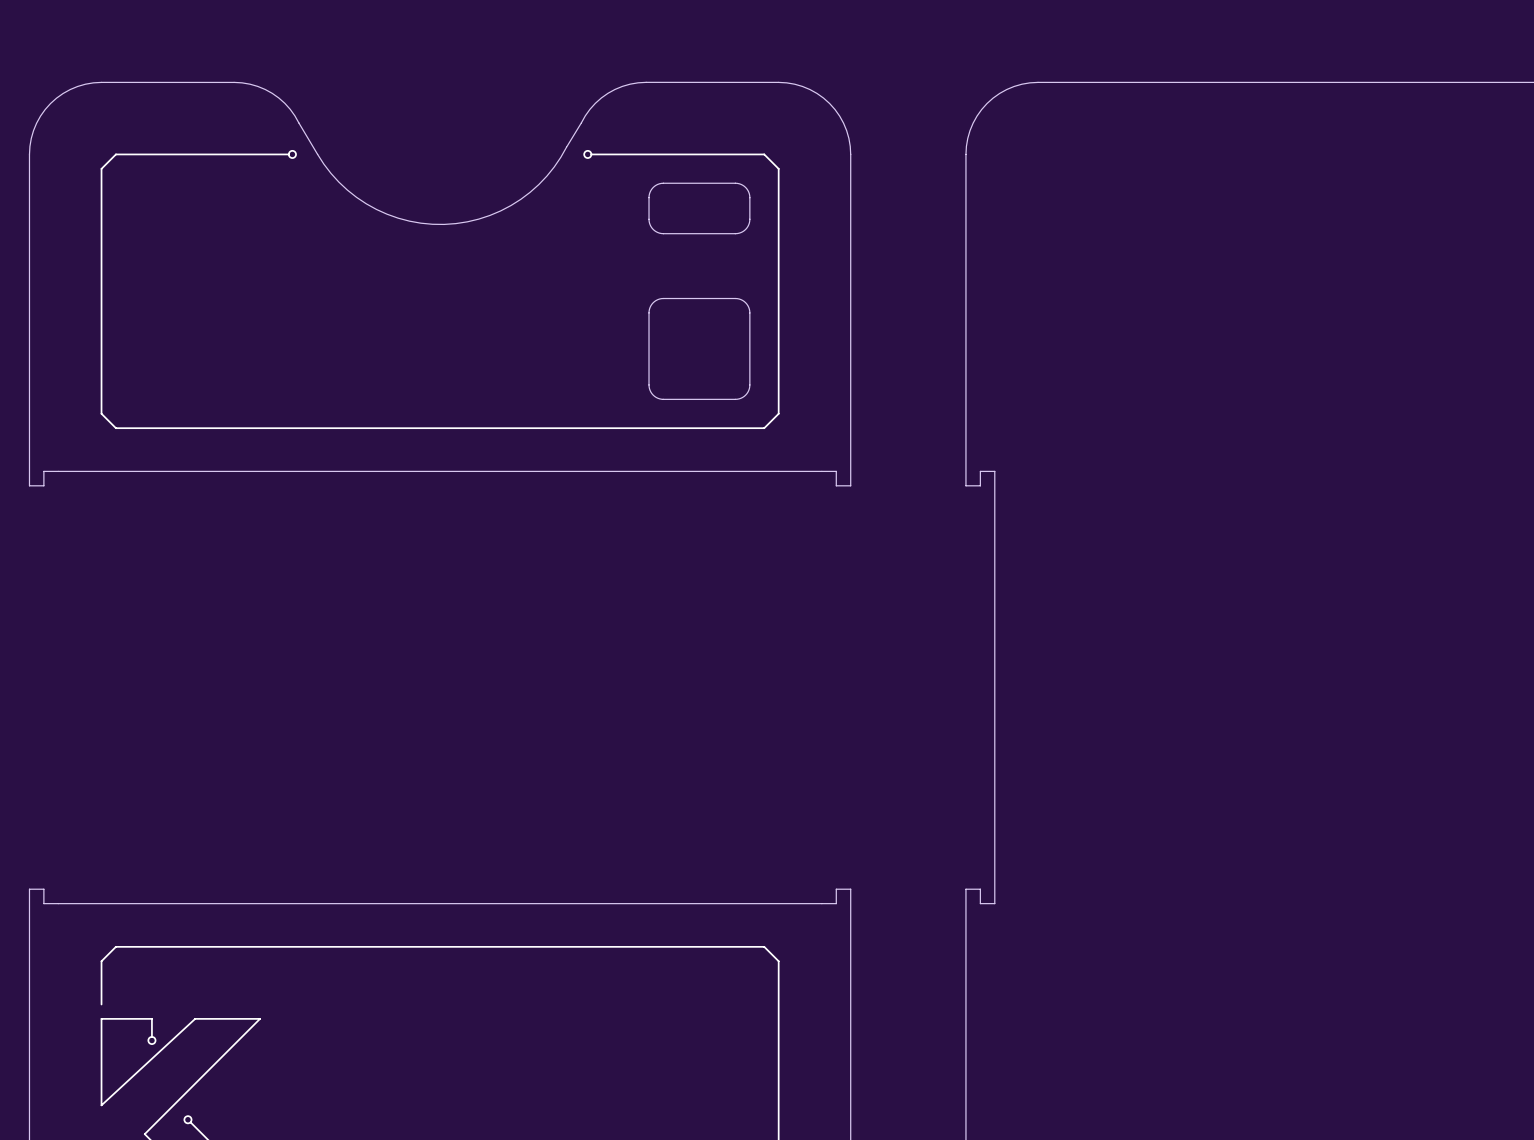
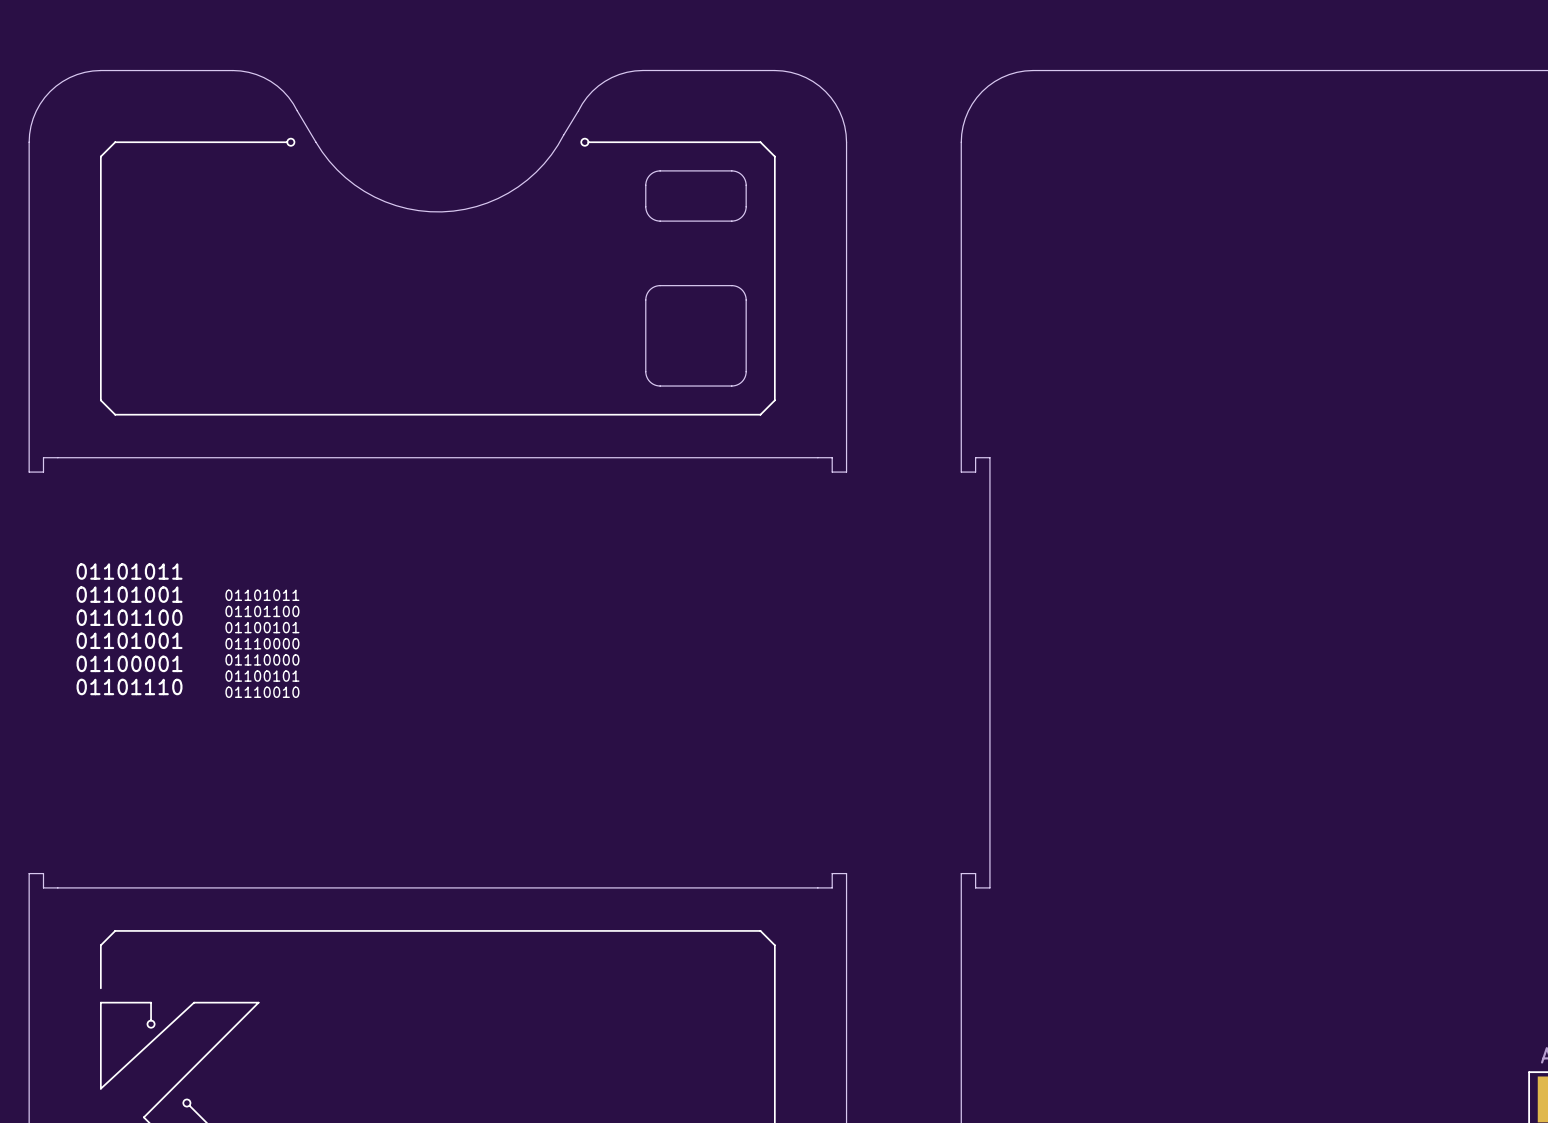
text: none -> 01101011 (129, 571)
text: none -> 01101001 (129, 594)
text: none -> 01101011 (262, 595)
text: none -> 01101100 (262, 611)
text: none -> 01101100 (129, 617)
text: none -> 01100101 (262, 627)
text: none -> 01101001 (129, 640)
text: none -> 01110000 (262, 643)
text: none -> 01110000 (262, 659)
text: none -> 01100001 (129, 663)
text: none -> 01100101 (262, 676)
text: none -> 01101110 (129, 686)
text: none -> 01110010 (262, 692)

